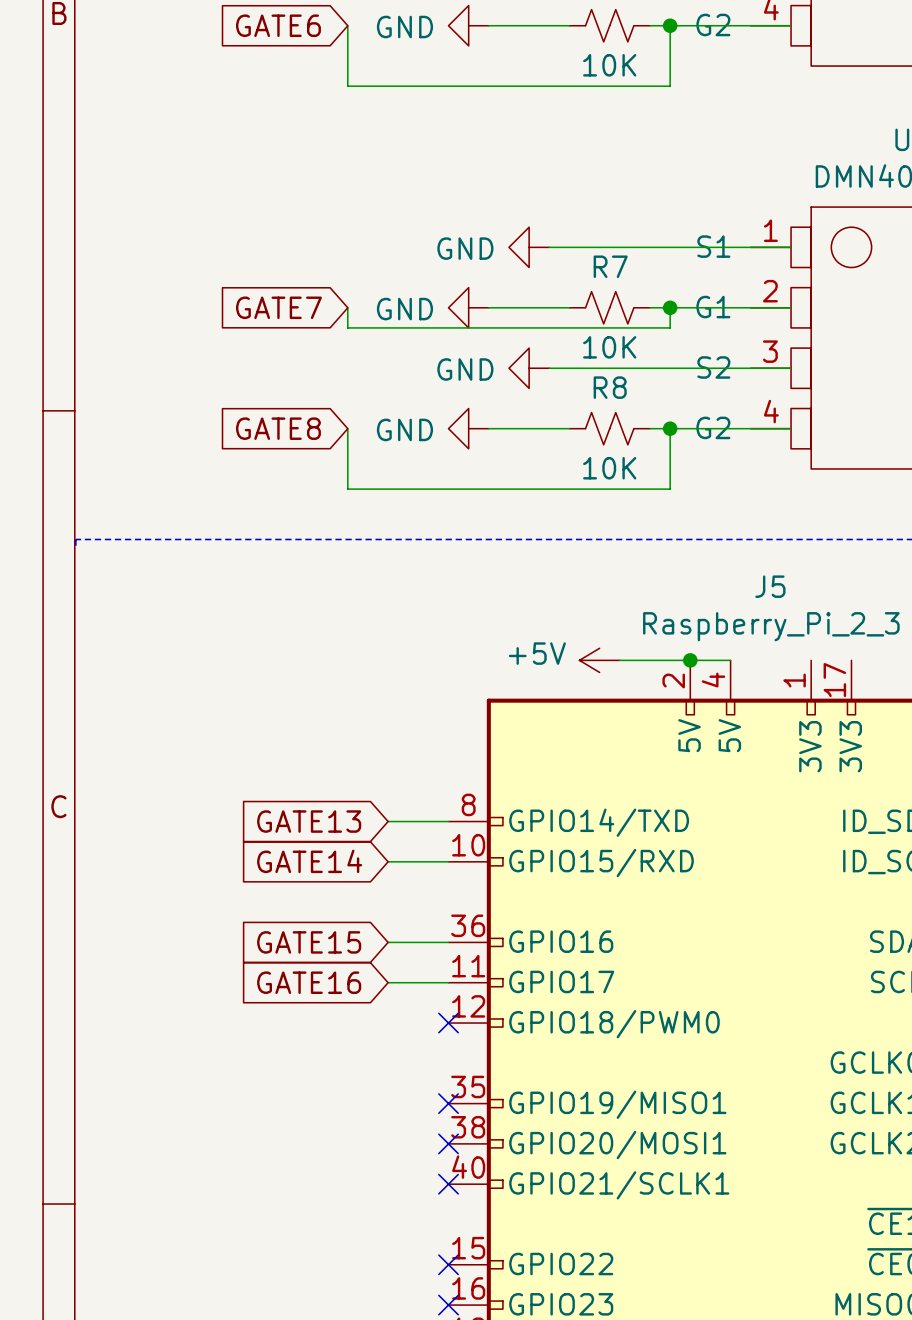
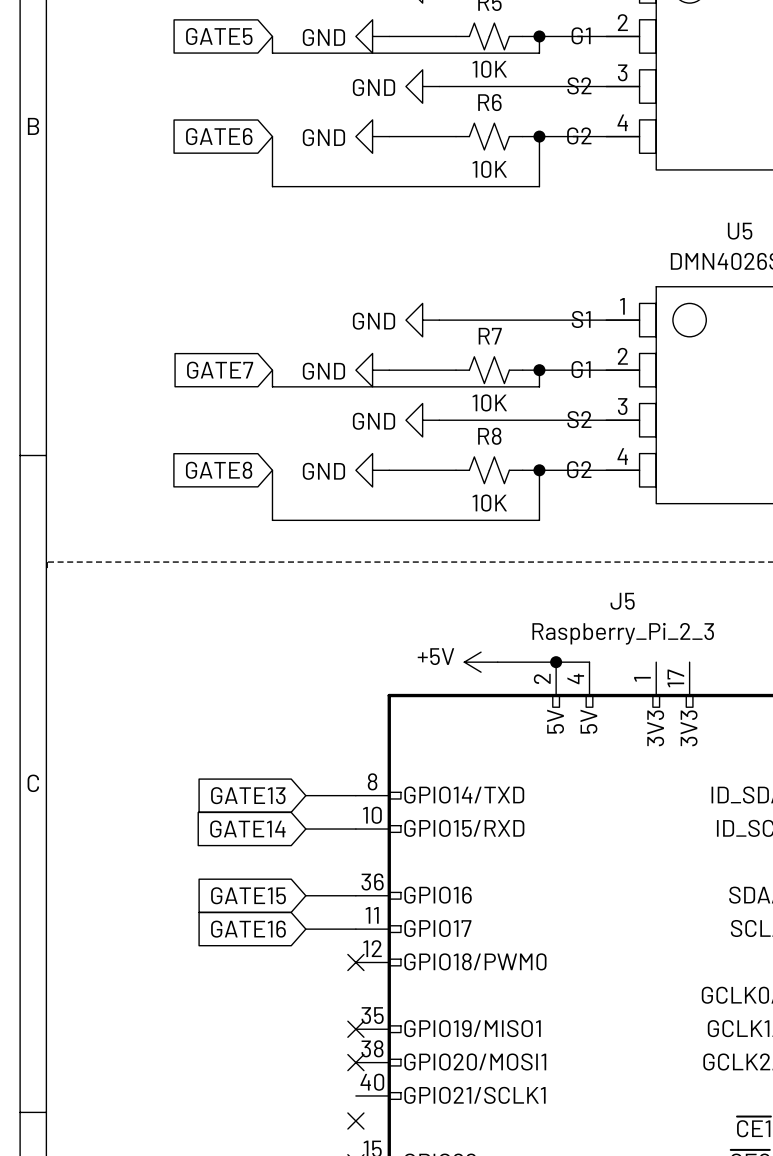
no-connect mark position: (448, 1184) -> (355, 1121)

